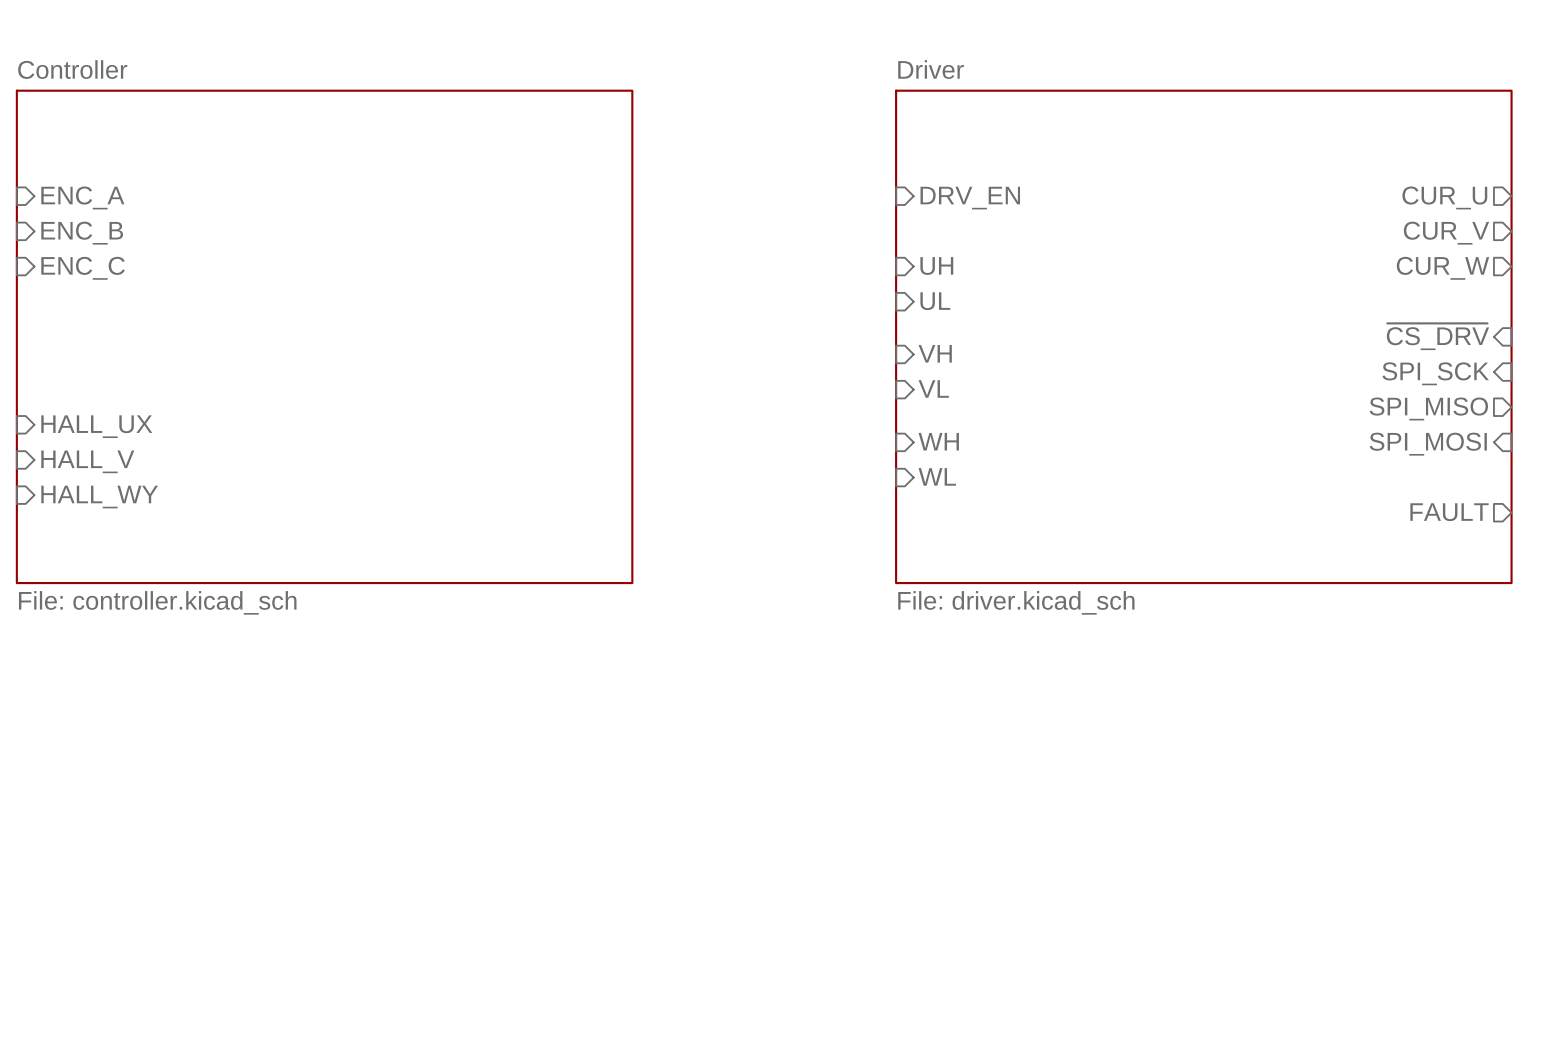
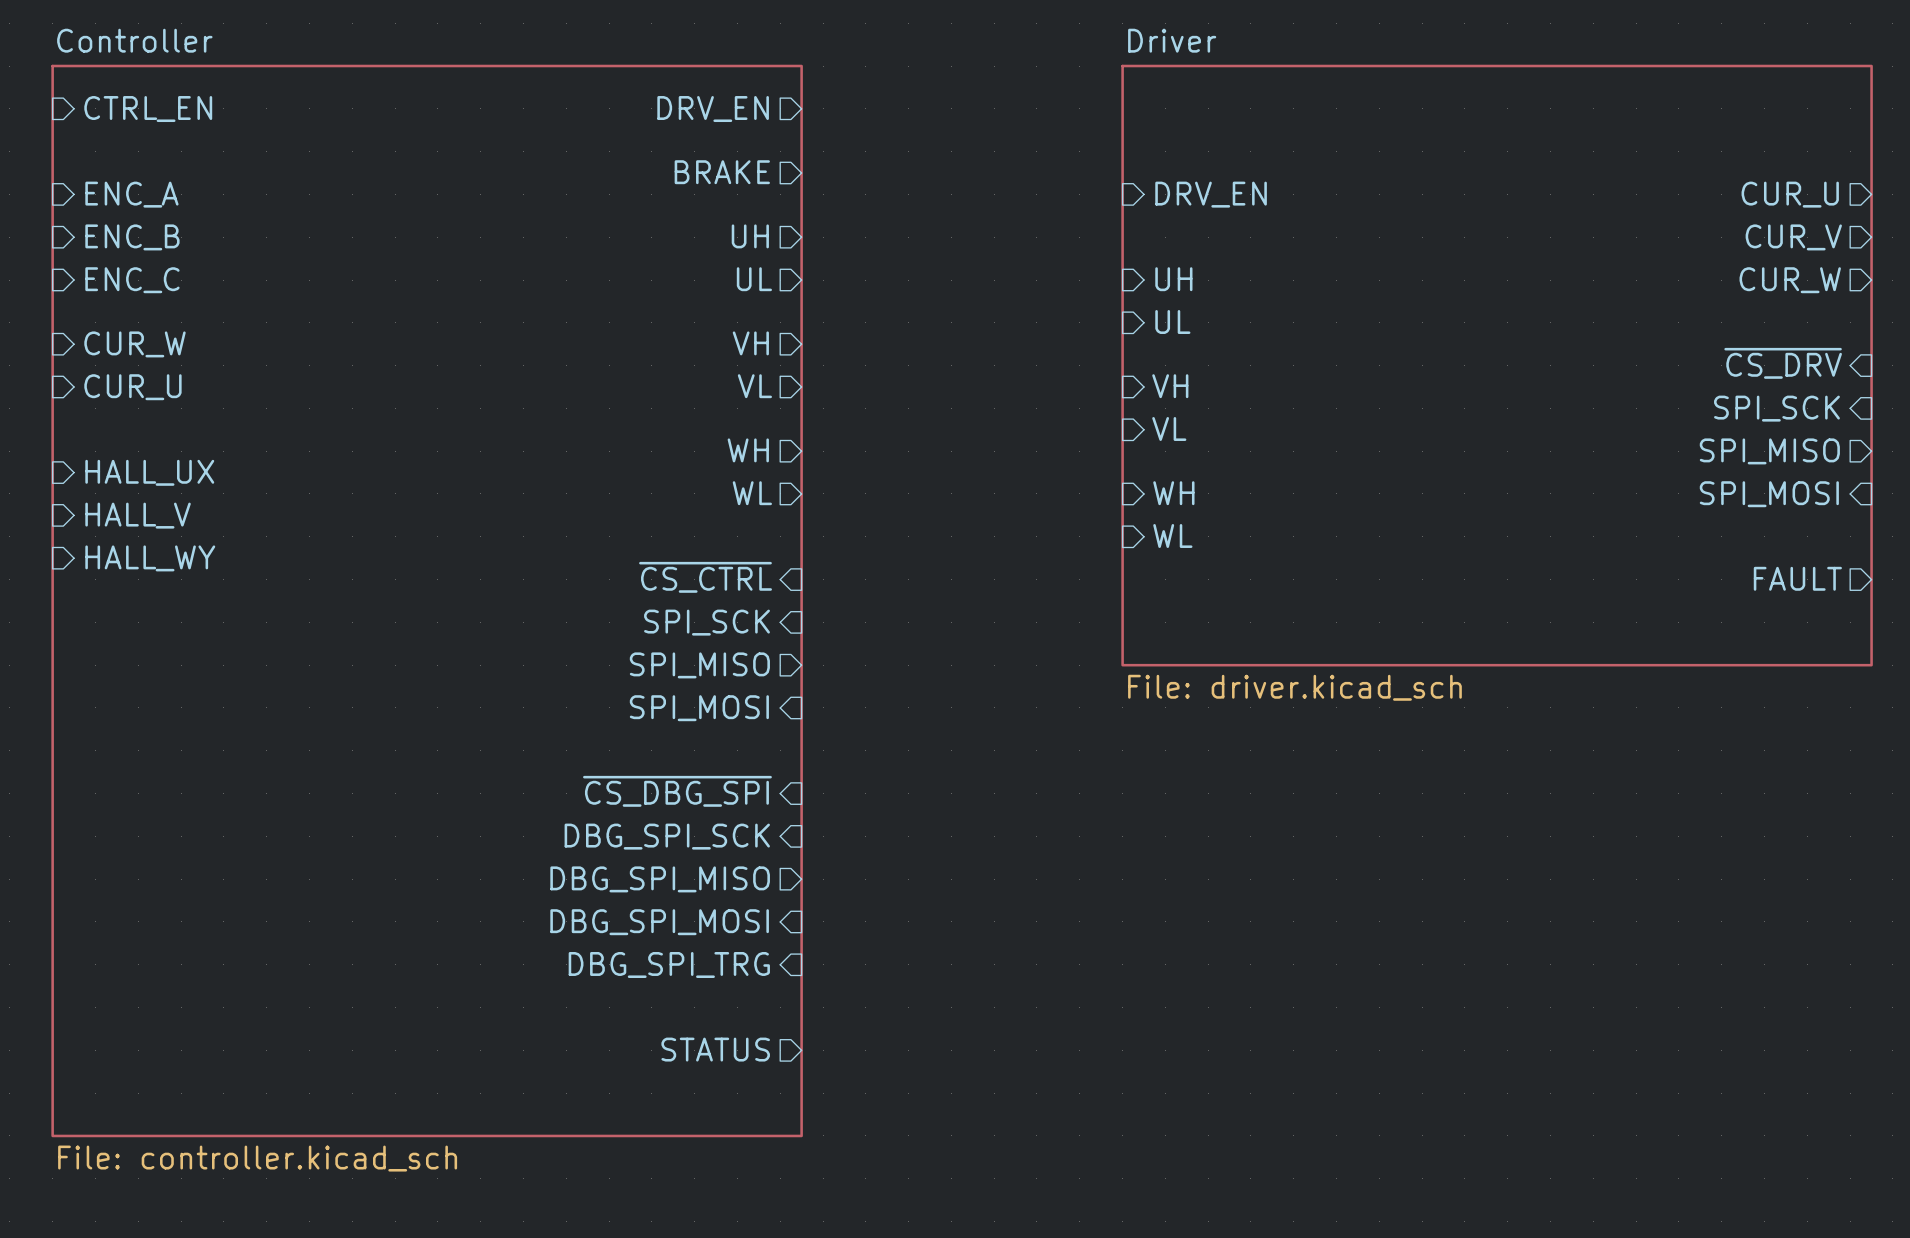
sheet pin: none -> CTRL_EN (148, 109)
sheet pin: none -> DRV_EN (713, 109)
sheet pin: none -> BRAKE (722, 172)
sheet pin: none -> UH (750, 236)
sheet pin: none -> UL (754, 279)
sheet pin: none -> VH (750, 343)
sheet pin: none -> CUR_W (134, 344)
sheet Controller: File: controller.kicad_sch (324, 336) -> none
sheet pin: none -> VL (754, 386)
sheet pin: none -> CUR_U (132, 387)
sheet pin: none -> WH (748, 450)
sheet pin: none -> WL (752, 493)
sheet pin: none -> ~{CS_CTRL} (705, 577)
sheet Controller: none -> File: controller.kicad_sch (427, 600)
sheet pin: none -> SPI_SCK (707, 622)
sheet pin: none -> SPI_MISO (699, 665)
sheet pin: none -> SPI_MOSI (699, 708)
sheet pin: none -> ~{CS_DBG_SPI} (677, 791)
sheet pin: none -> DBG_SPI_SCK (667, 836)
sheet pin: none -> DBG_SPI_MISO (660, 879)
sheet pin: none -> DBG_SPI_MOSI (659, 922)
sheet pin: none -> DBG_SPI_TRG (669, 964)
sheet pin: none -> STATUS (715, 1049)

